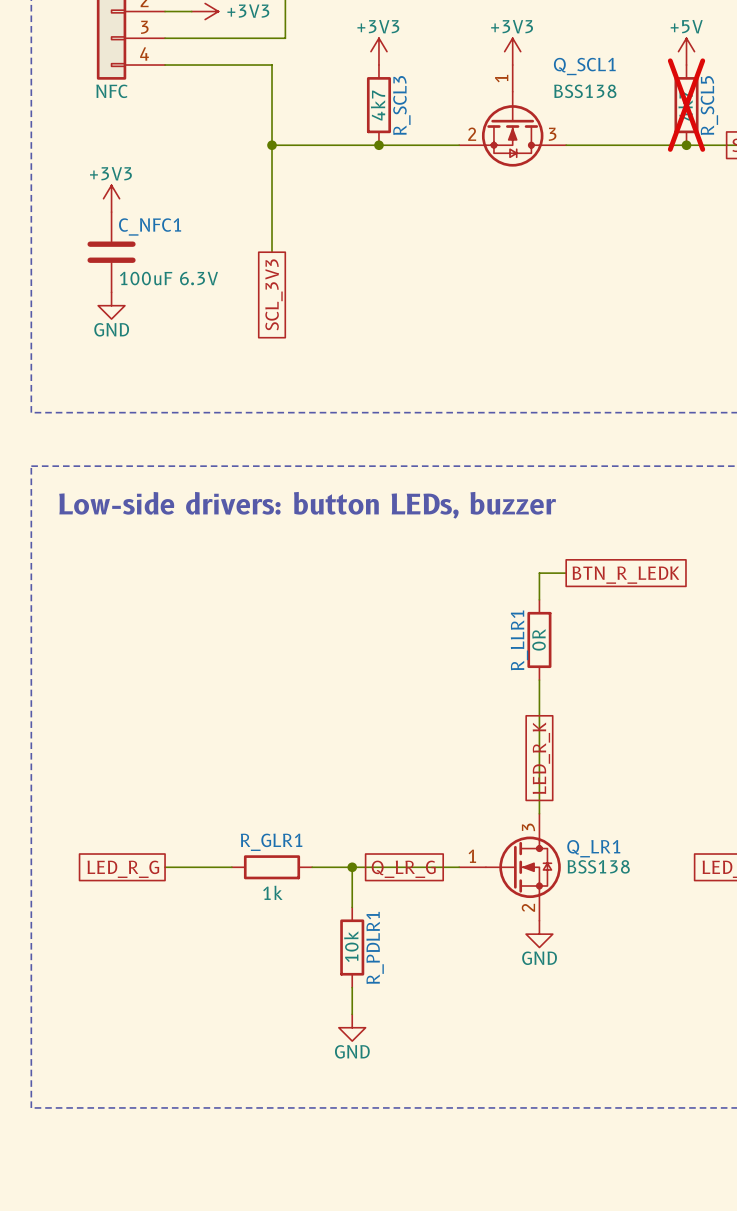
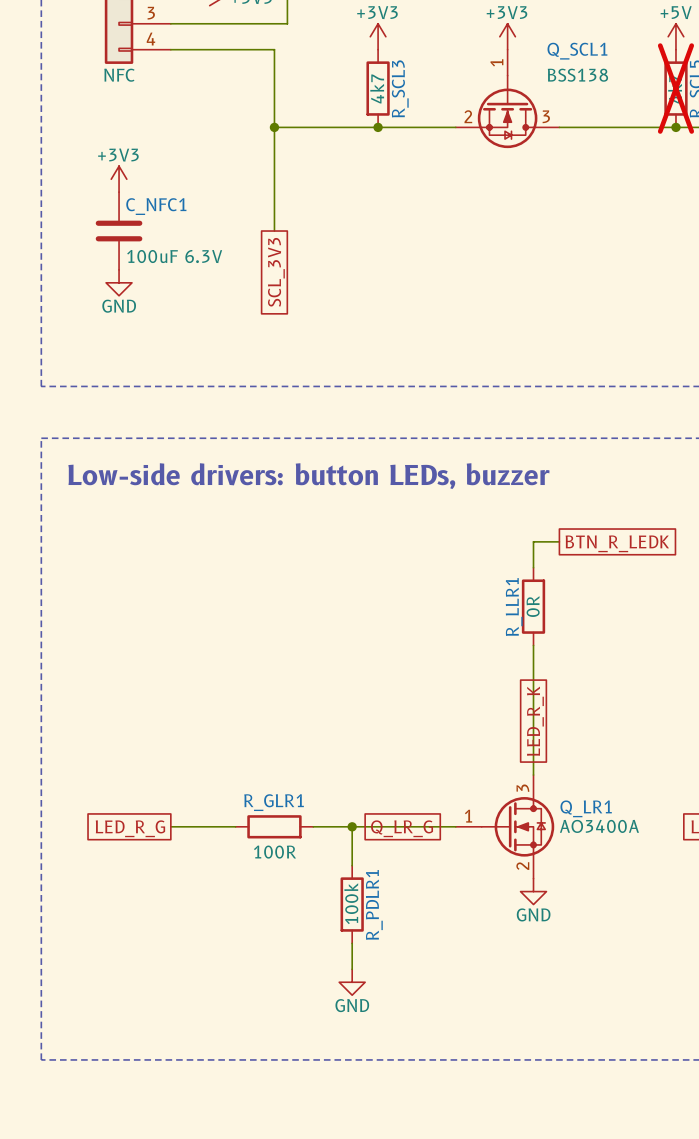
Q_LR1 value: BSS138 (598, 866) -> AO3400A (599, 826)
R_GLR1 value: 1k (272, 892) -> 100R (275, 852)
R_PDLR1 value: 10k (351, 946) -> 100k (351, 903)

